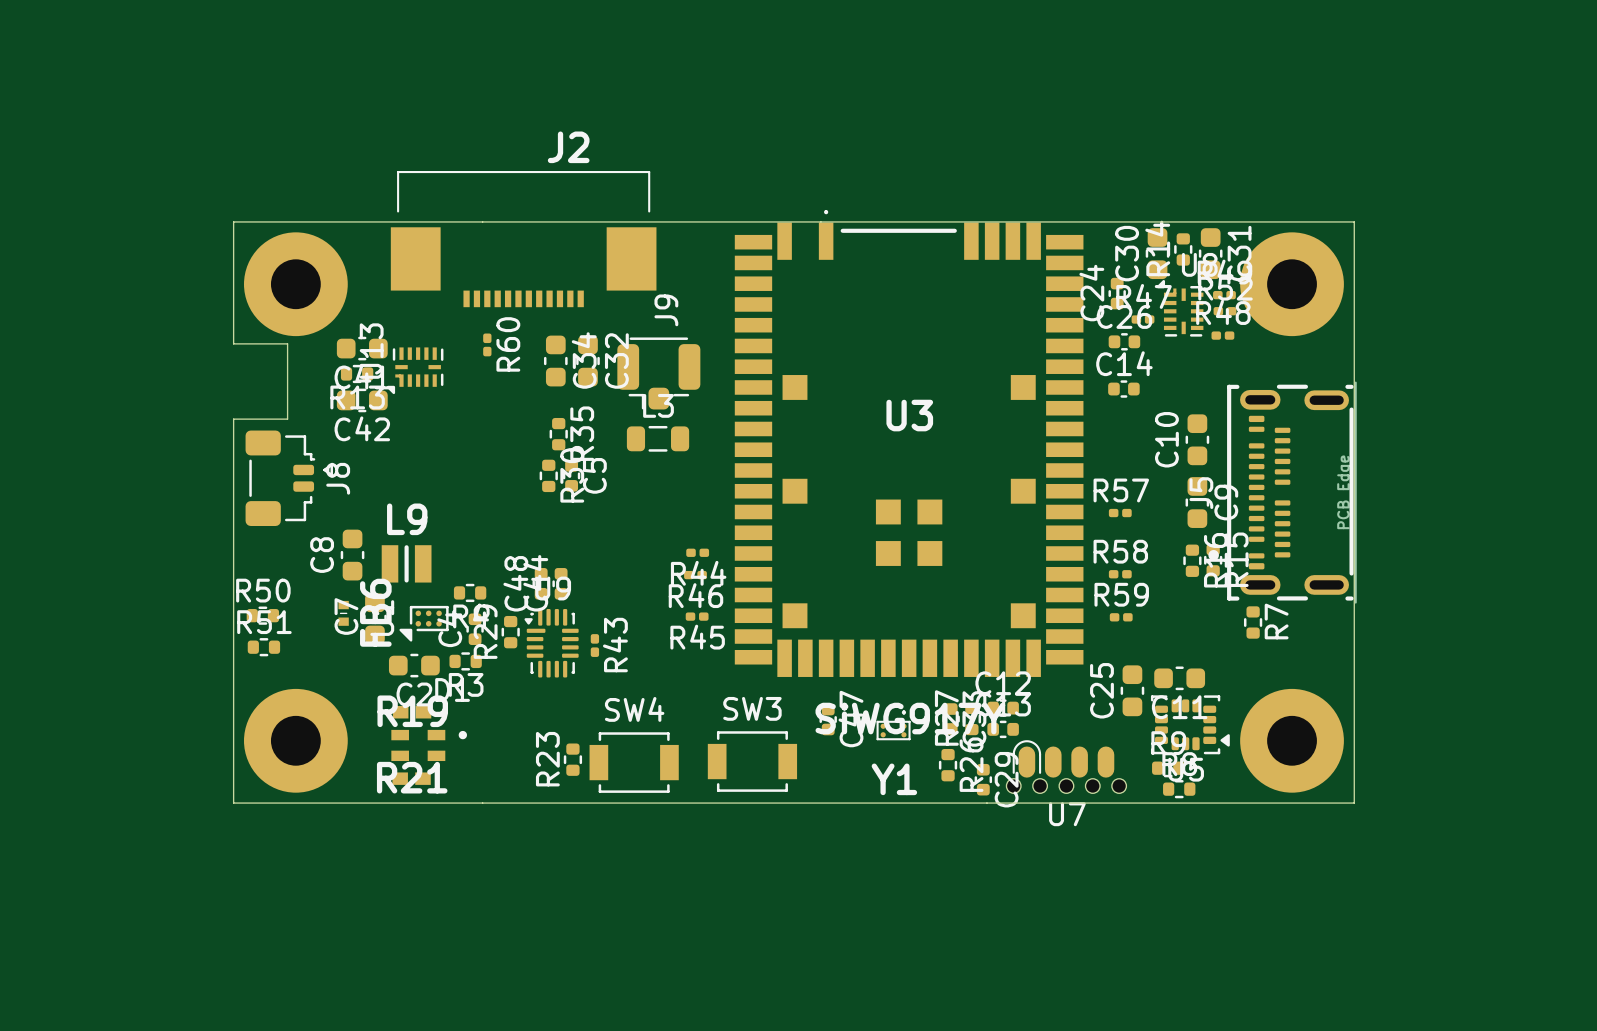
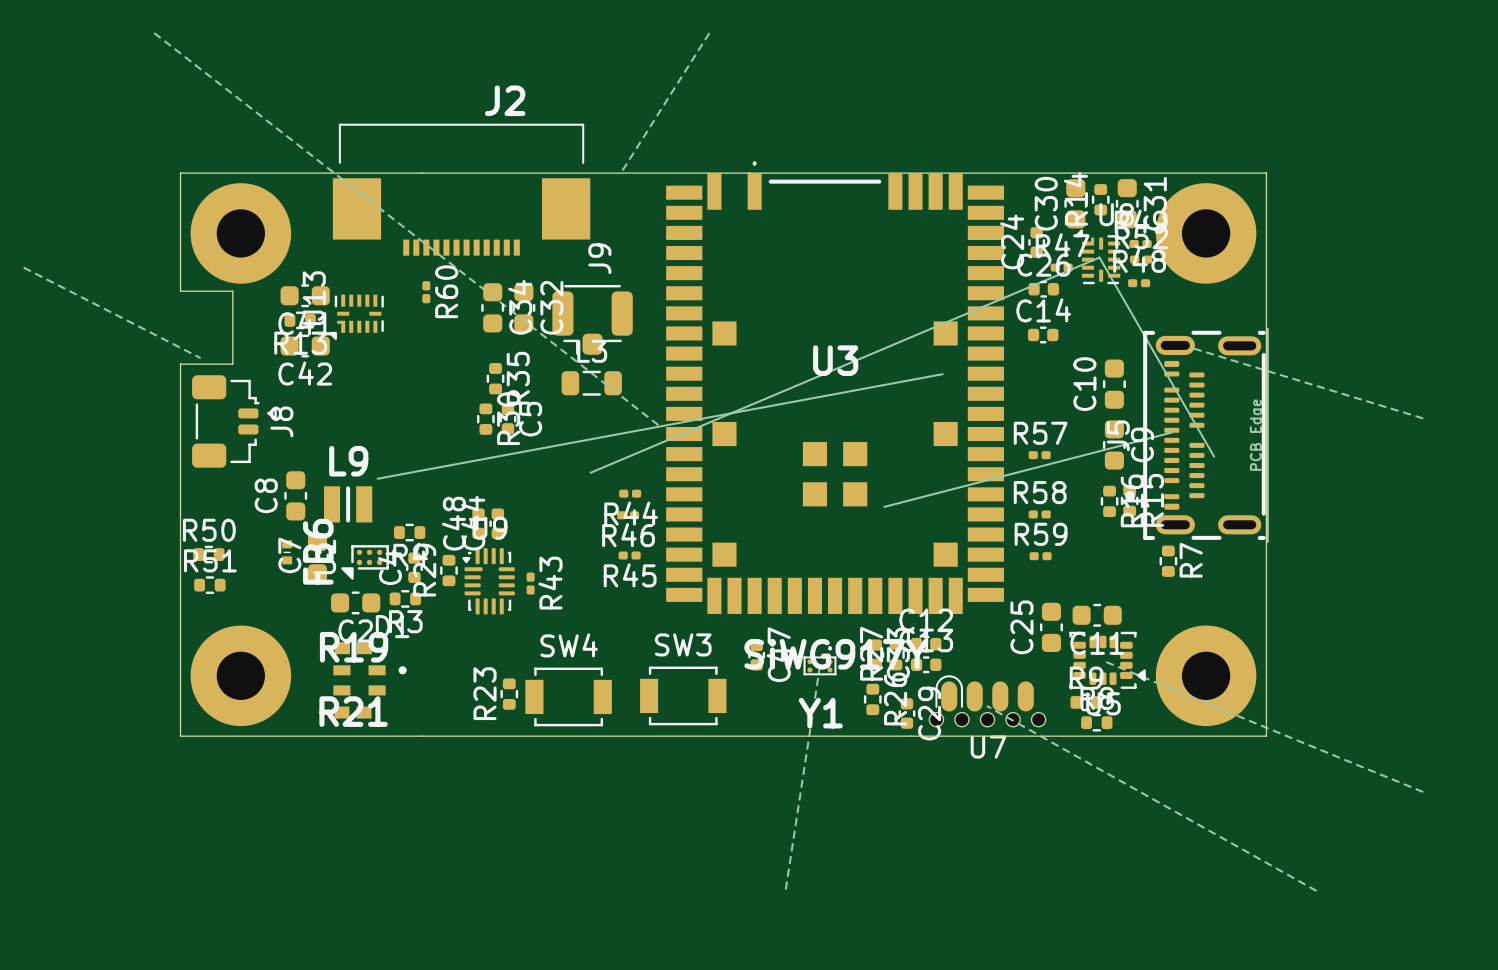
line: none -> (154, 33) (660, 426)
line: none -> (709, 33) (620, 173)
line: none -> (23, 267) (200, 358)
line: none -> (1192, 348) (1423, 418)
line: none -> (942, 374) (377, 478)
line: none -> (1171, 432) (884, 506)
line: none -> (1214, 456) (1099, 257) (590, 472)
line: none -> (1105, 661) (1423, 792)
line: none -> (819, 665) (785, 889)
line: none -> (986, 705) (1316, 891)

